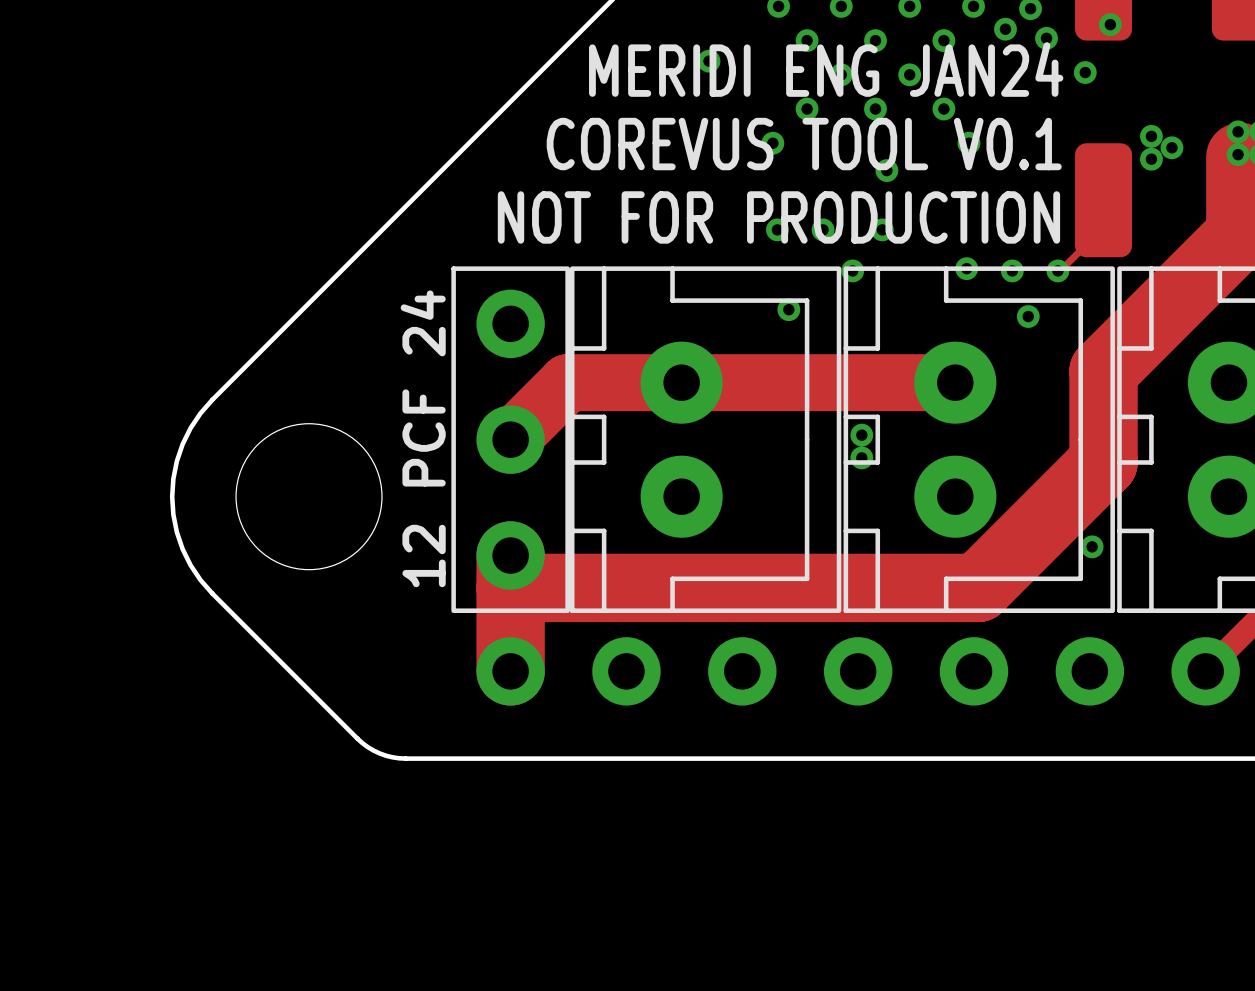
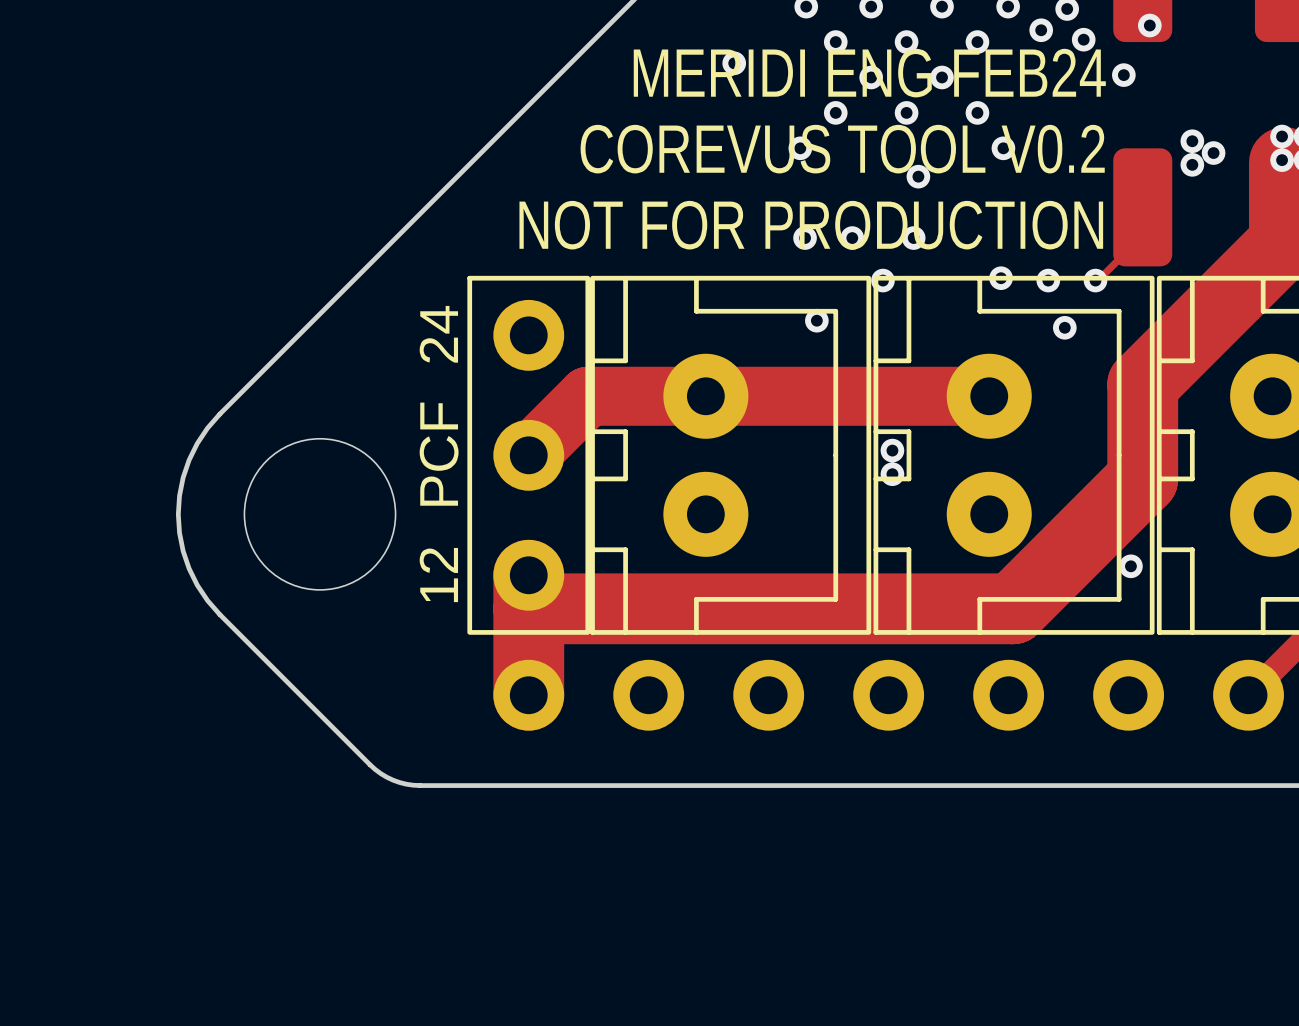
text: MERIDI ENG JAN24 (826, 69) -> MERIDI ENG FEB24 (869, 73)
text: COREVUS TOOL V0.1 (804, 144) -> COREVUS TOOL V0.2 (842, 149)

